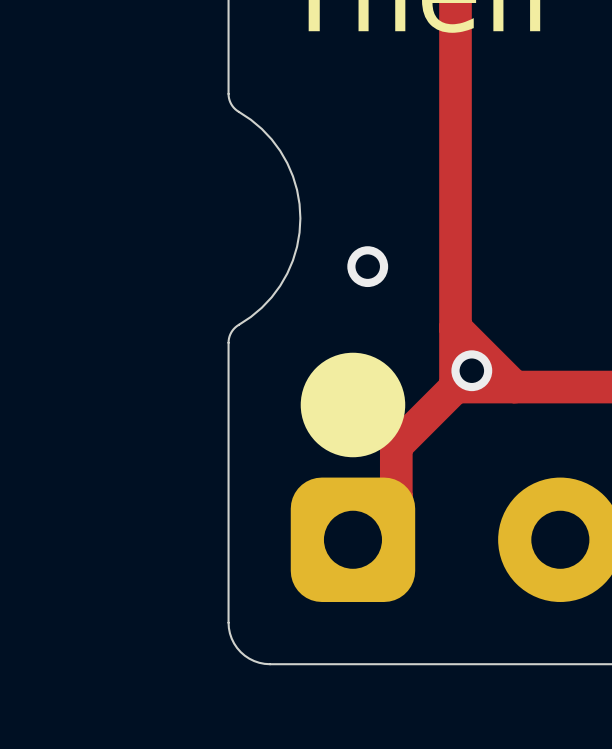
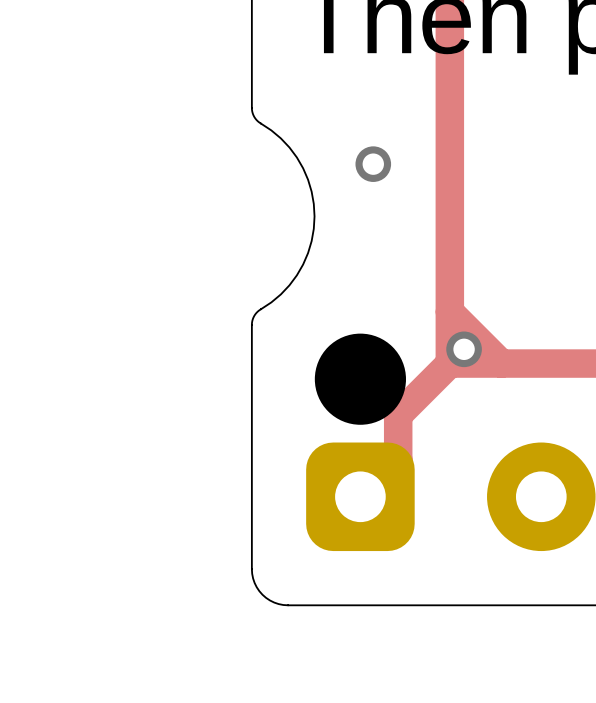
via position: (367, 266) -> (373, 164)

